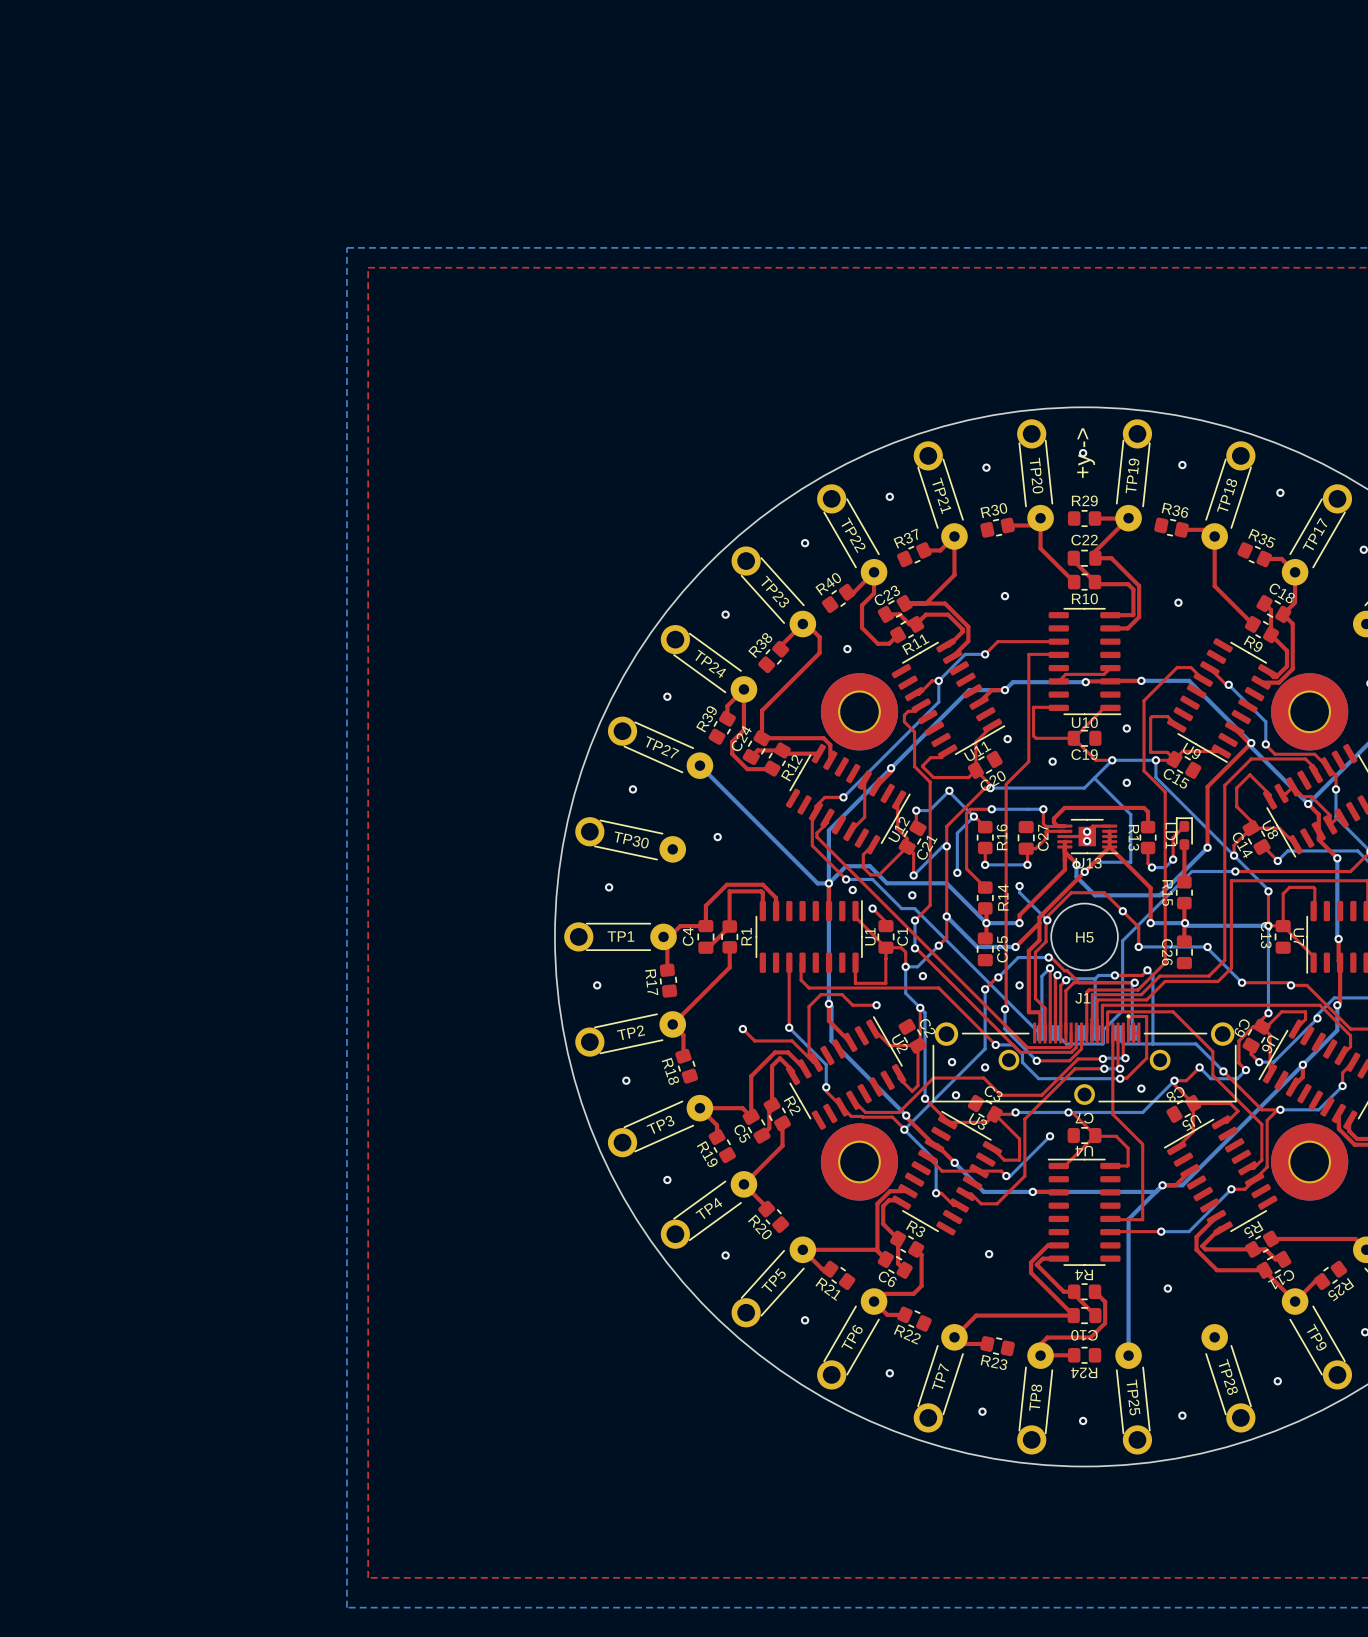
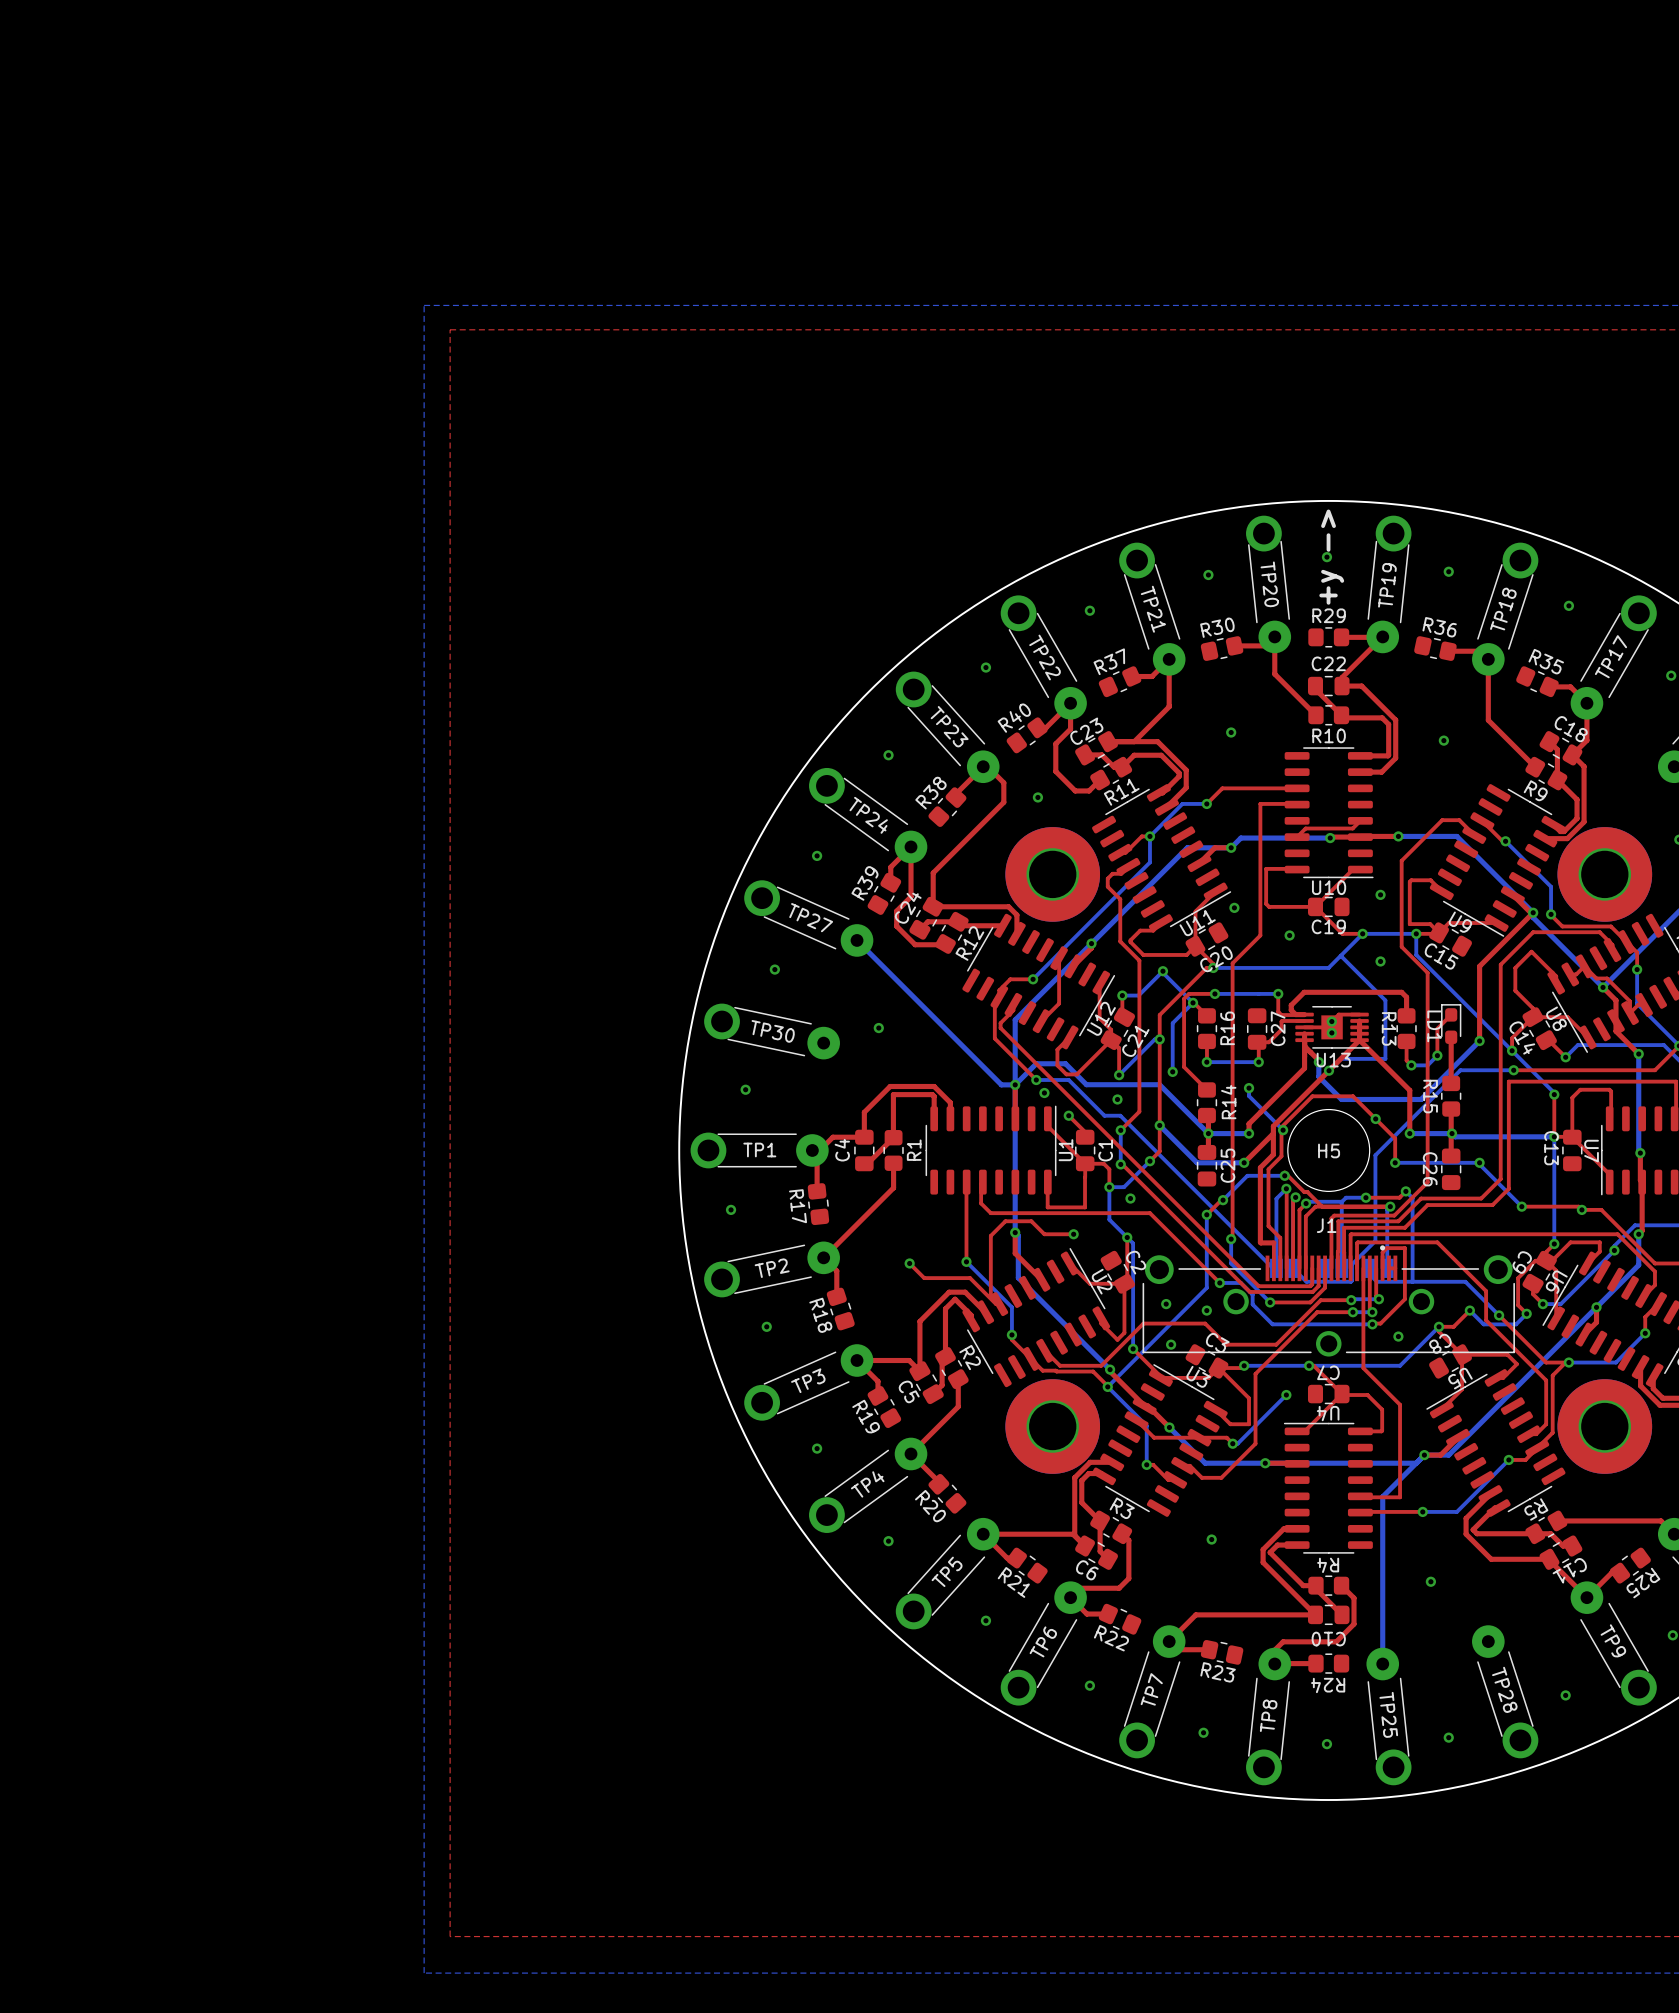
via: (1019, 985) -> none

